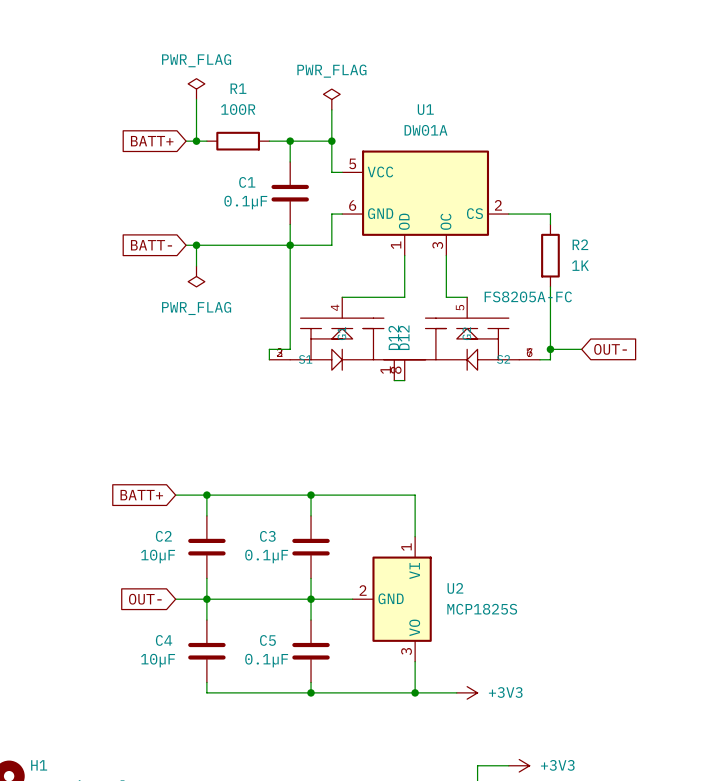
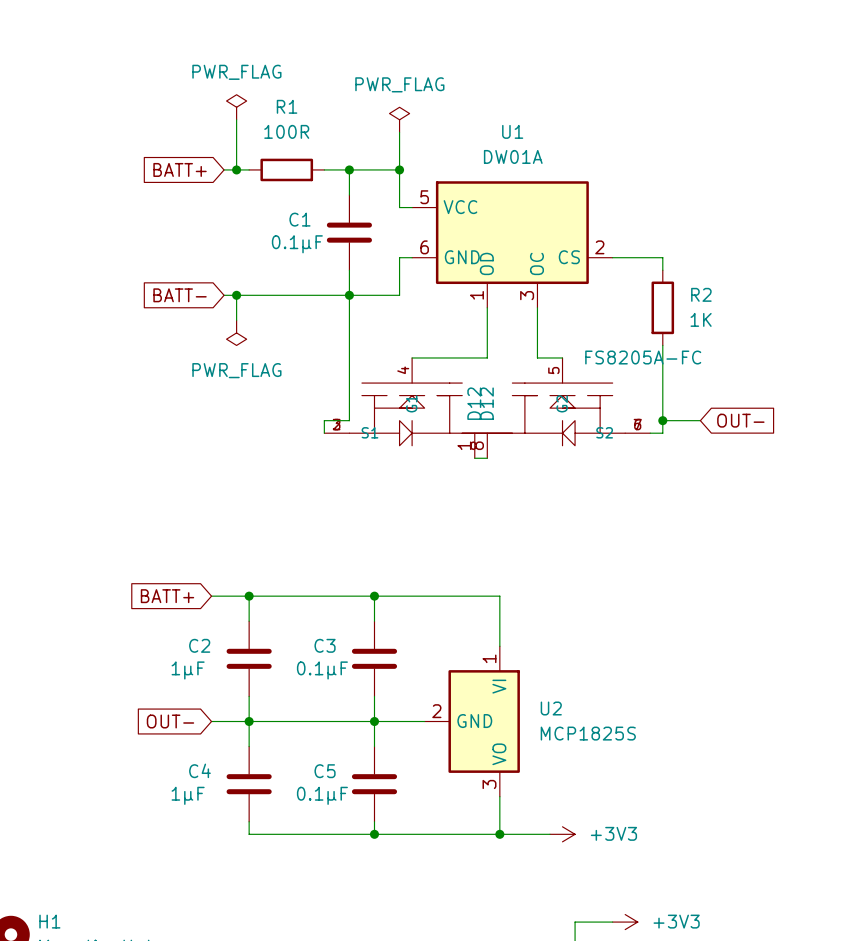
C2 value: 10µF (158, 556) -> 1µF (188, 670)
C4 value: 10µF (158, 660) -> 1µF (188, 795)

